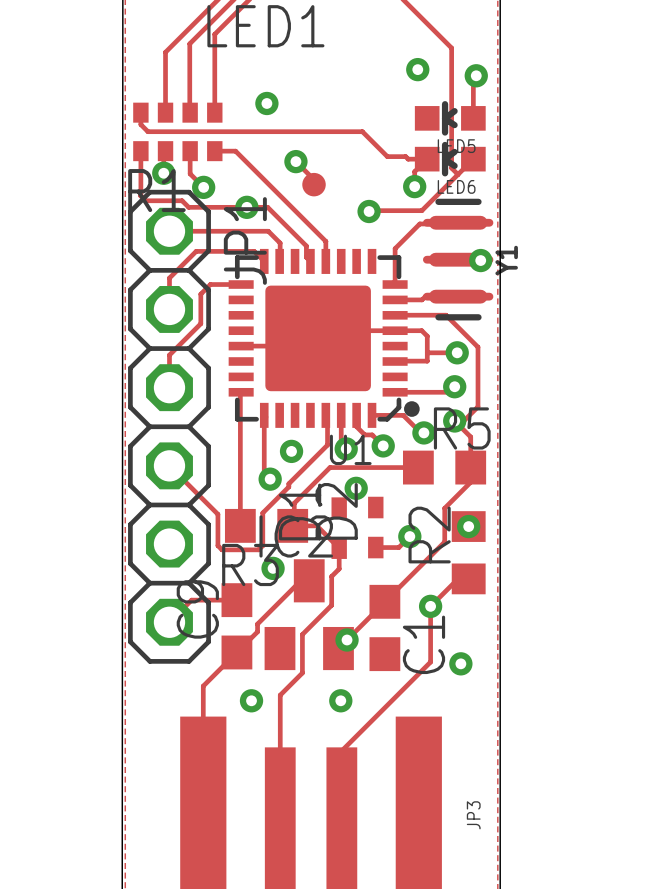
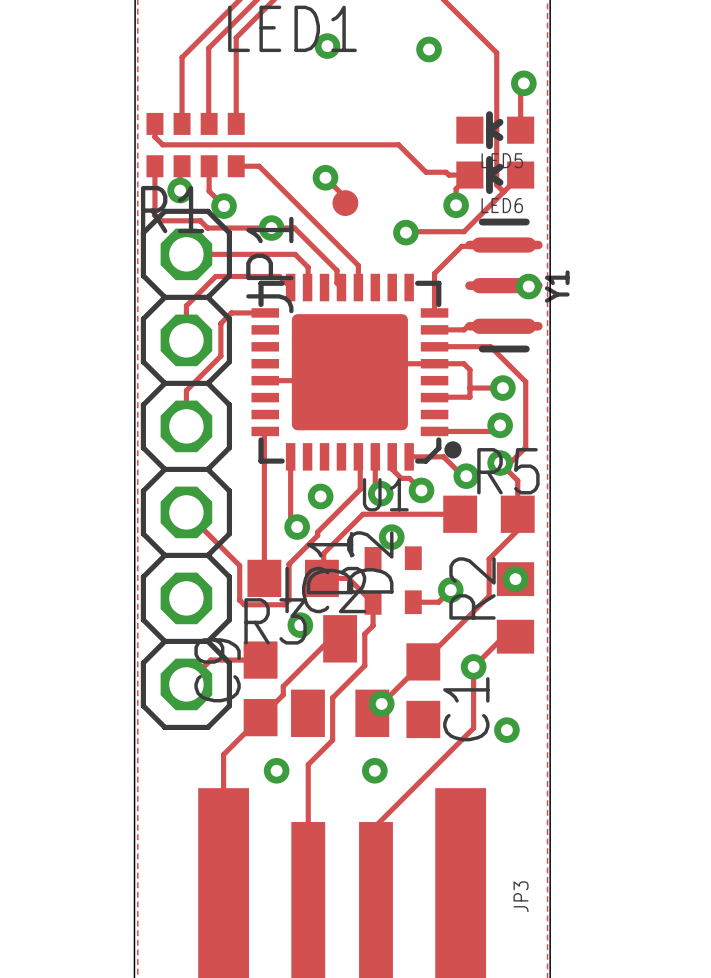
via: none -> (327, 46)
via position: (417, 69) -> (429, 49)
via: (266, 103) -> none

